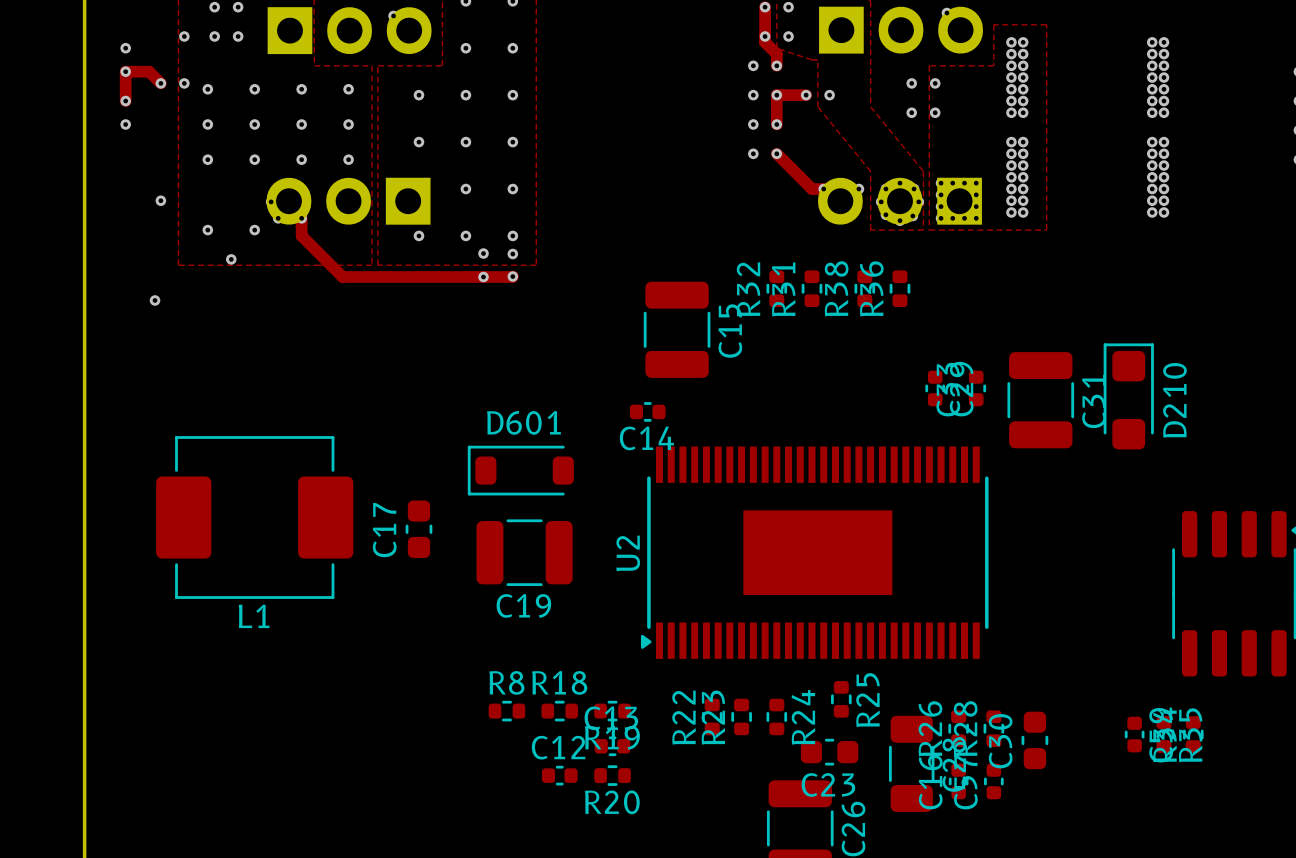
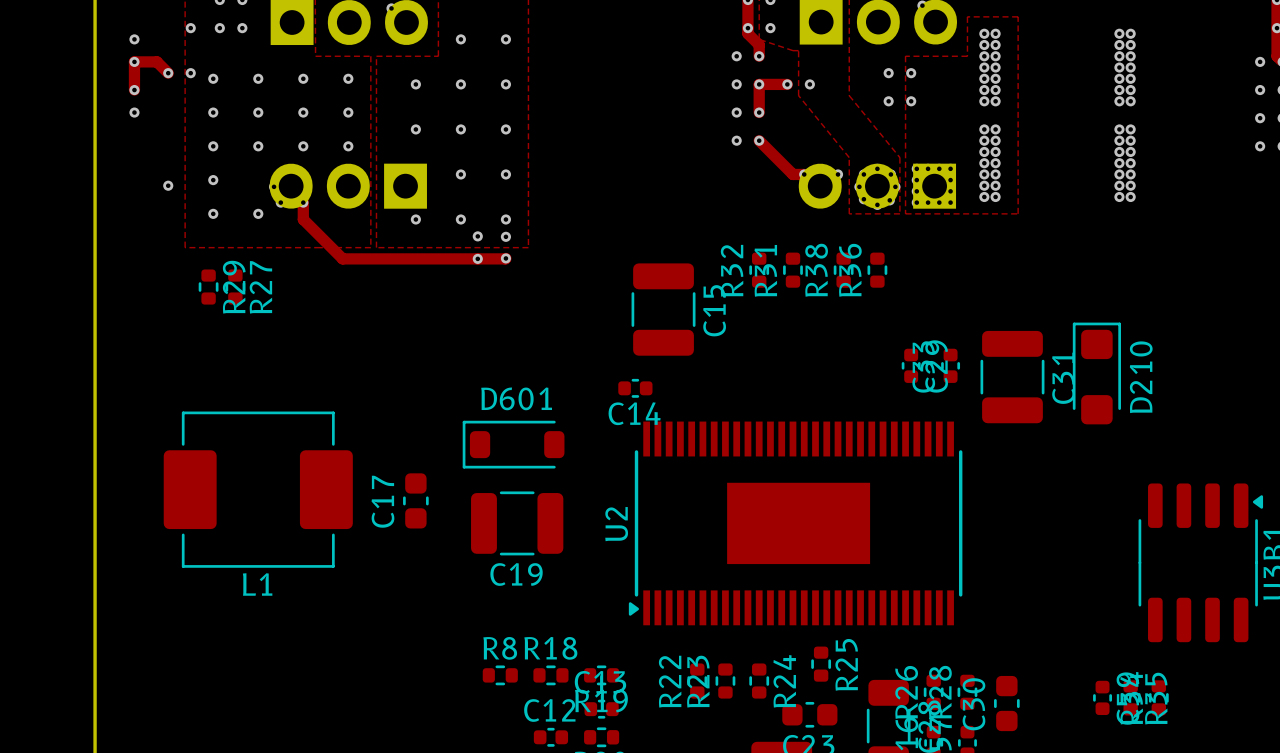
via: none -> (213, 180)
via: (231, 259) -> none
via: (155, 300) -> none
R29: none -> (208, 287)
R27: none -> (235, 287)

